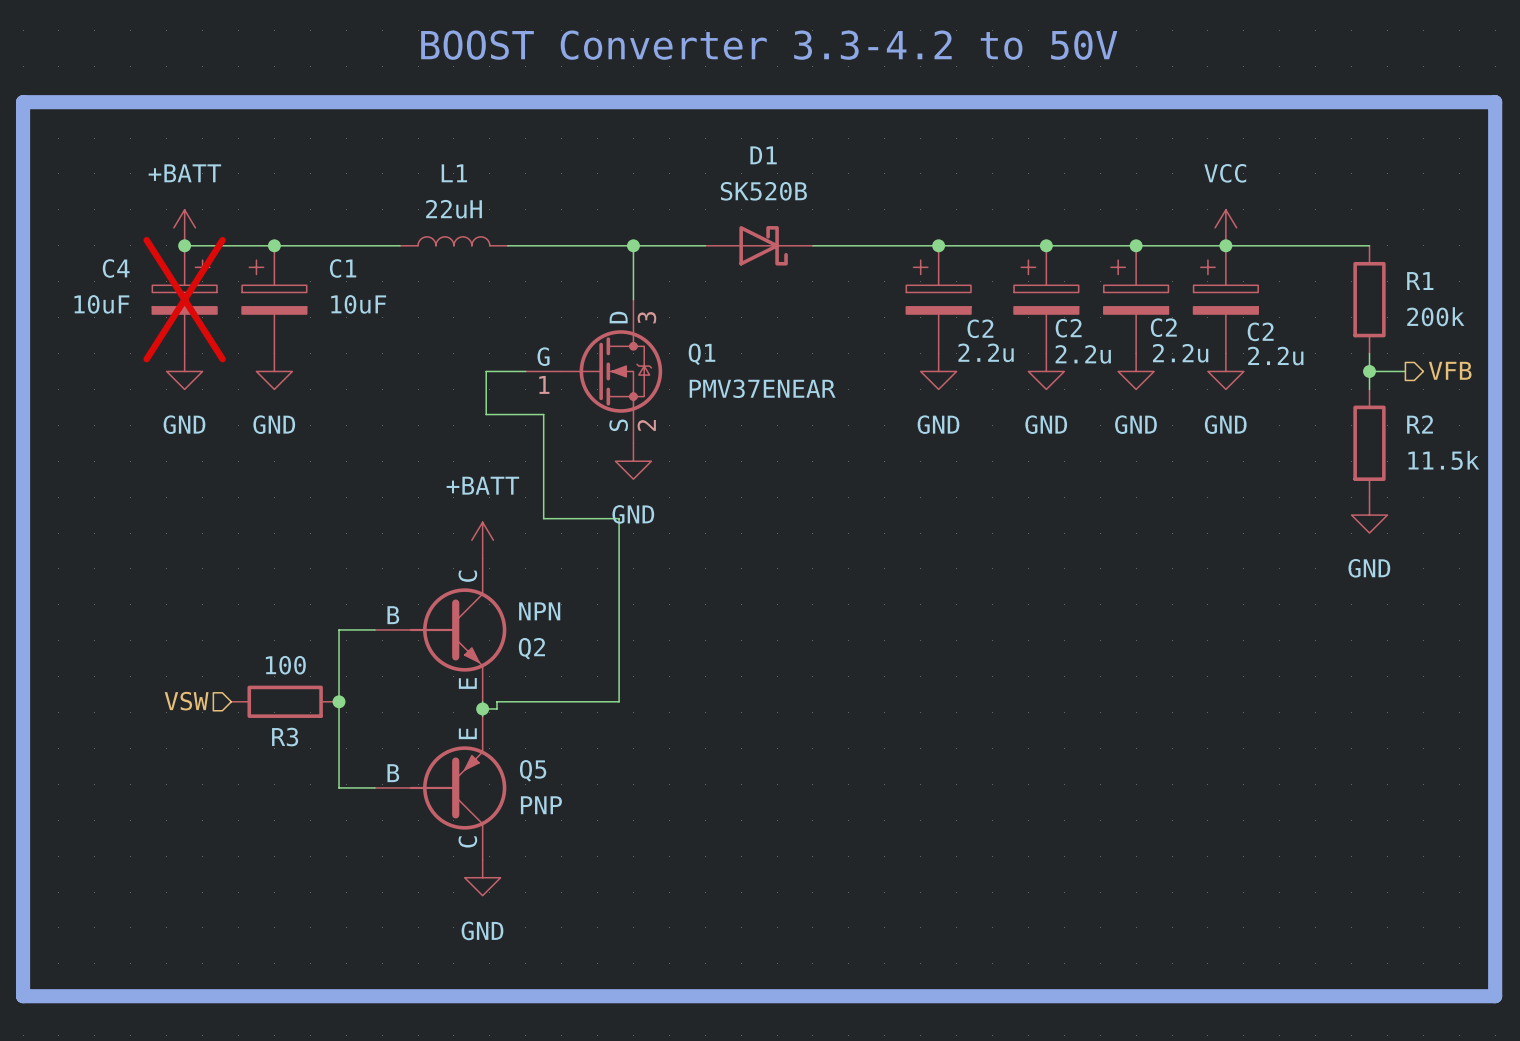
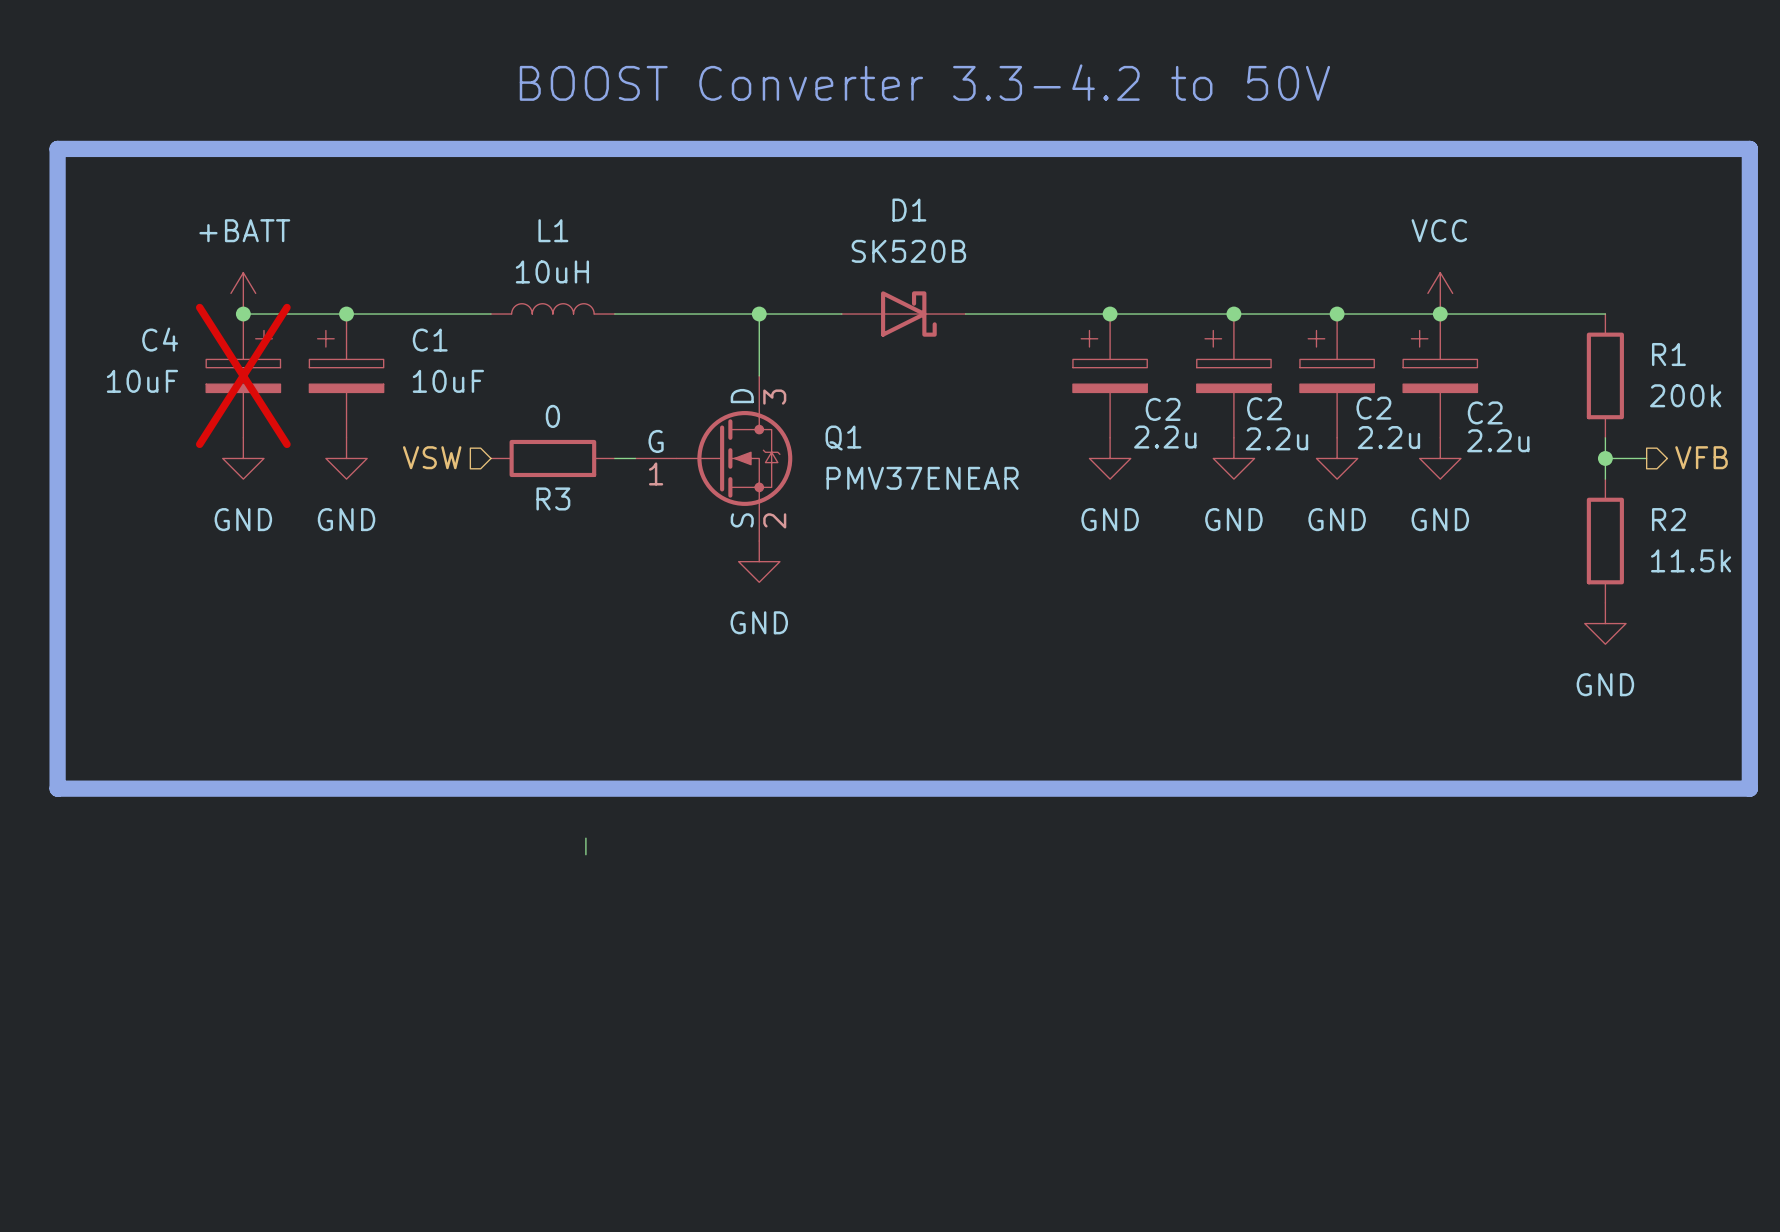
L1 value: 22uH (454, 209) -> 10uH (552, 271)
hierarchical label: none -> VSW (432, 457)
wire: (507, 371) (486, 371) (486, 414) (543, 414) (543, 518) (619, 518) (619, 701) (497, 701) (497, 708) (482, 708) -> none
power symbol: +BATT (482, 540) -> none
wire: (374, 629) (339, 629) (339, 787) (374, 787) -> none
Q2: NPN (440, 629) -> none
line: (23, 658) (23, 996) (1495, 996) (1495, 658) -> (57, 788) (1749, 788)
R3 value: 100 (285, 665) -> 0 (552, 416)
hierarchical label: VSW (186, 701) -> none
R3 position: (285, 701) -> (552, 458)
junction: (339, 701) -> none
junction: (482, 708) -> none
Q5: PNP (440, 787) -> none
power symbol: GND (482, 877) -> none

